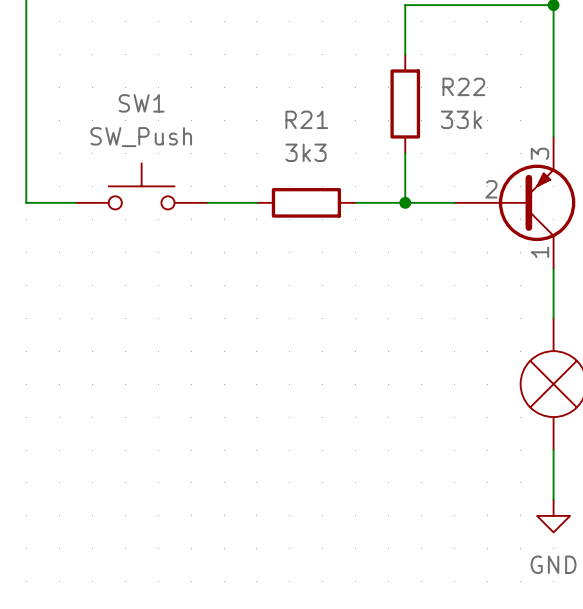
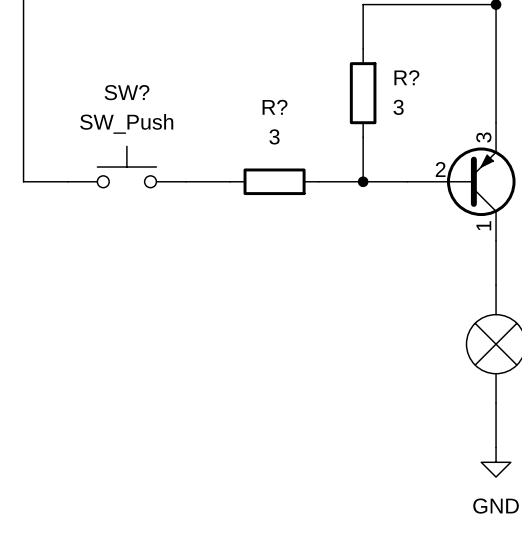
R22 name: R22 (463, 86) -> R? (406, 77)
SW1 name: SW1 (141, 103) -> SW? (126, 92)
R21 name: R21 (306, 119) -> R? (275, 107)
R22 value: 33k (461, 119) -> 3 (398, 107)
R21 value: 3k3 (306, 152) -> 3 (274, 136)

